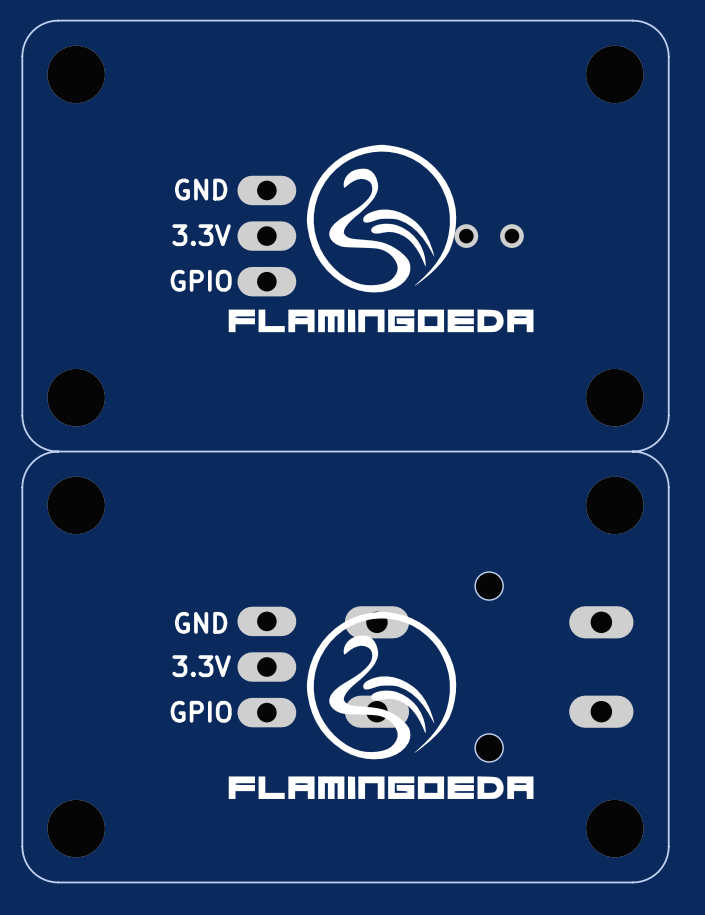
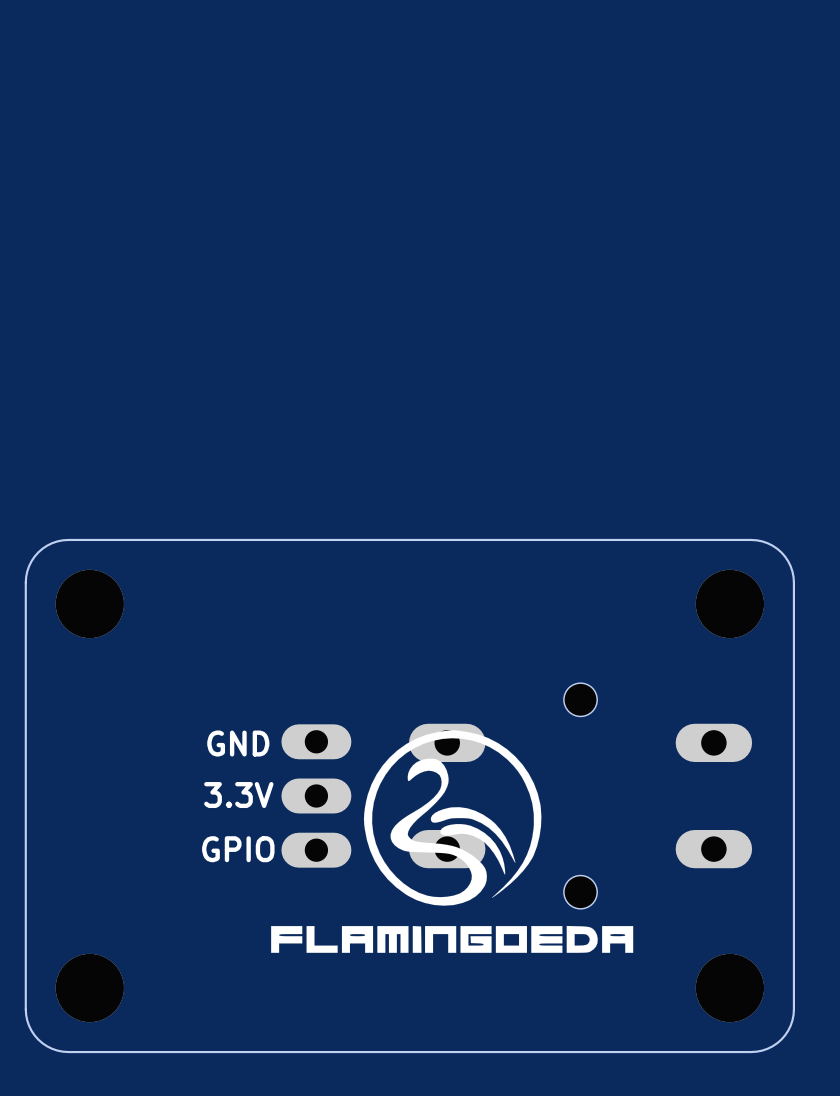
part: (76, 74) -> none
part: (614, 74) -> none
drawing: [228, 144, 534, 333] -> none
text: GND (201, 189) -> none
text: 3.3V (201, 235) -> none
part: (266, 236) -> none
part: (489, 236) -> none
text: GPIO (201, 280) -> none
part: (76, 397) -> none
part: (614, 397) -> none
board edge: (632, 451) (646, 448) (658, 441) (665, 429) (668, 415) (668, 51) (665, 42) (658, 31) (646, 23) (632, 20) (58, 20) (44, 23) (36, 28) (27, 38) (22, 56) (22, 415) (25, 429) (32, 441) (44, 448) (58, 451) -> none

